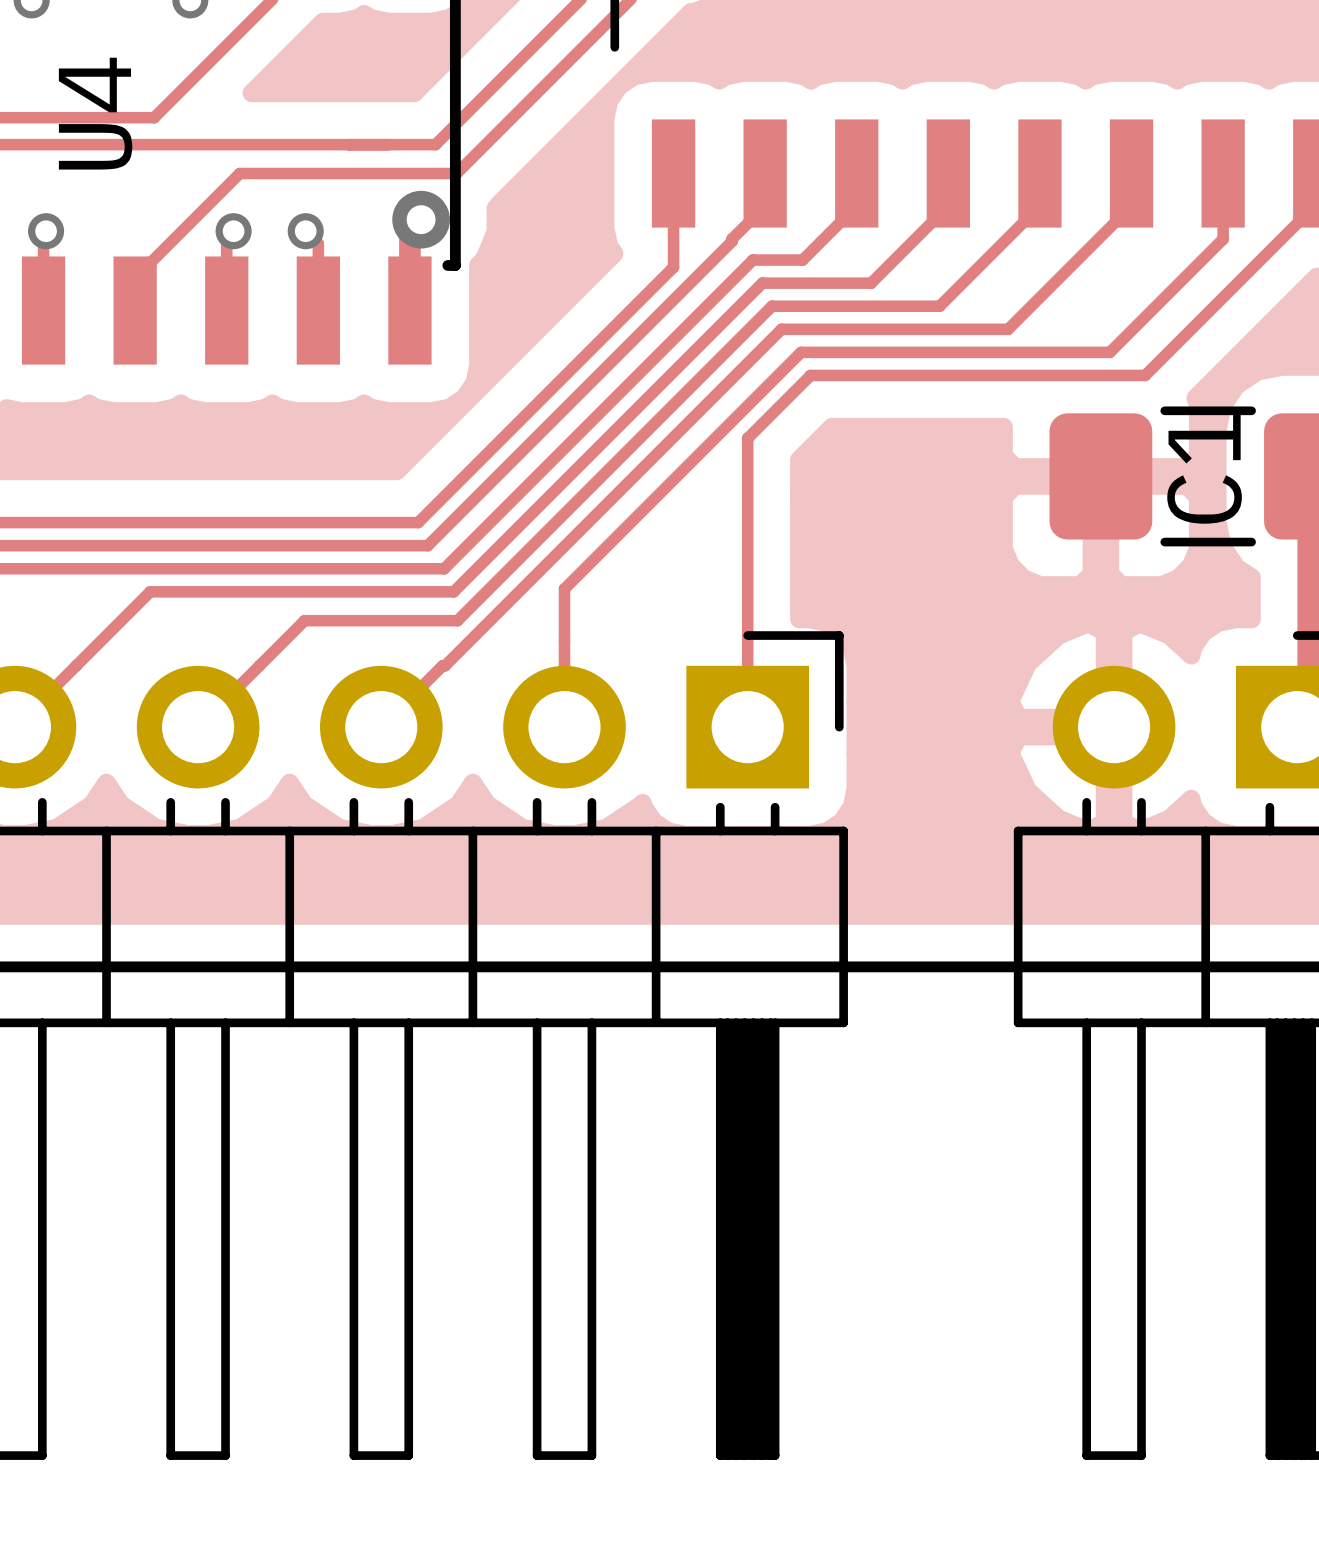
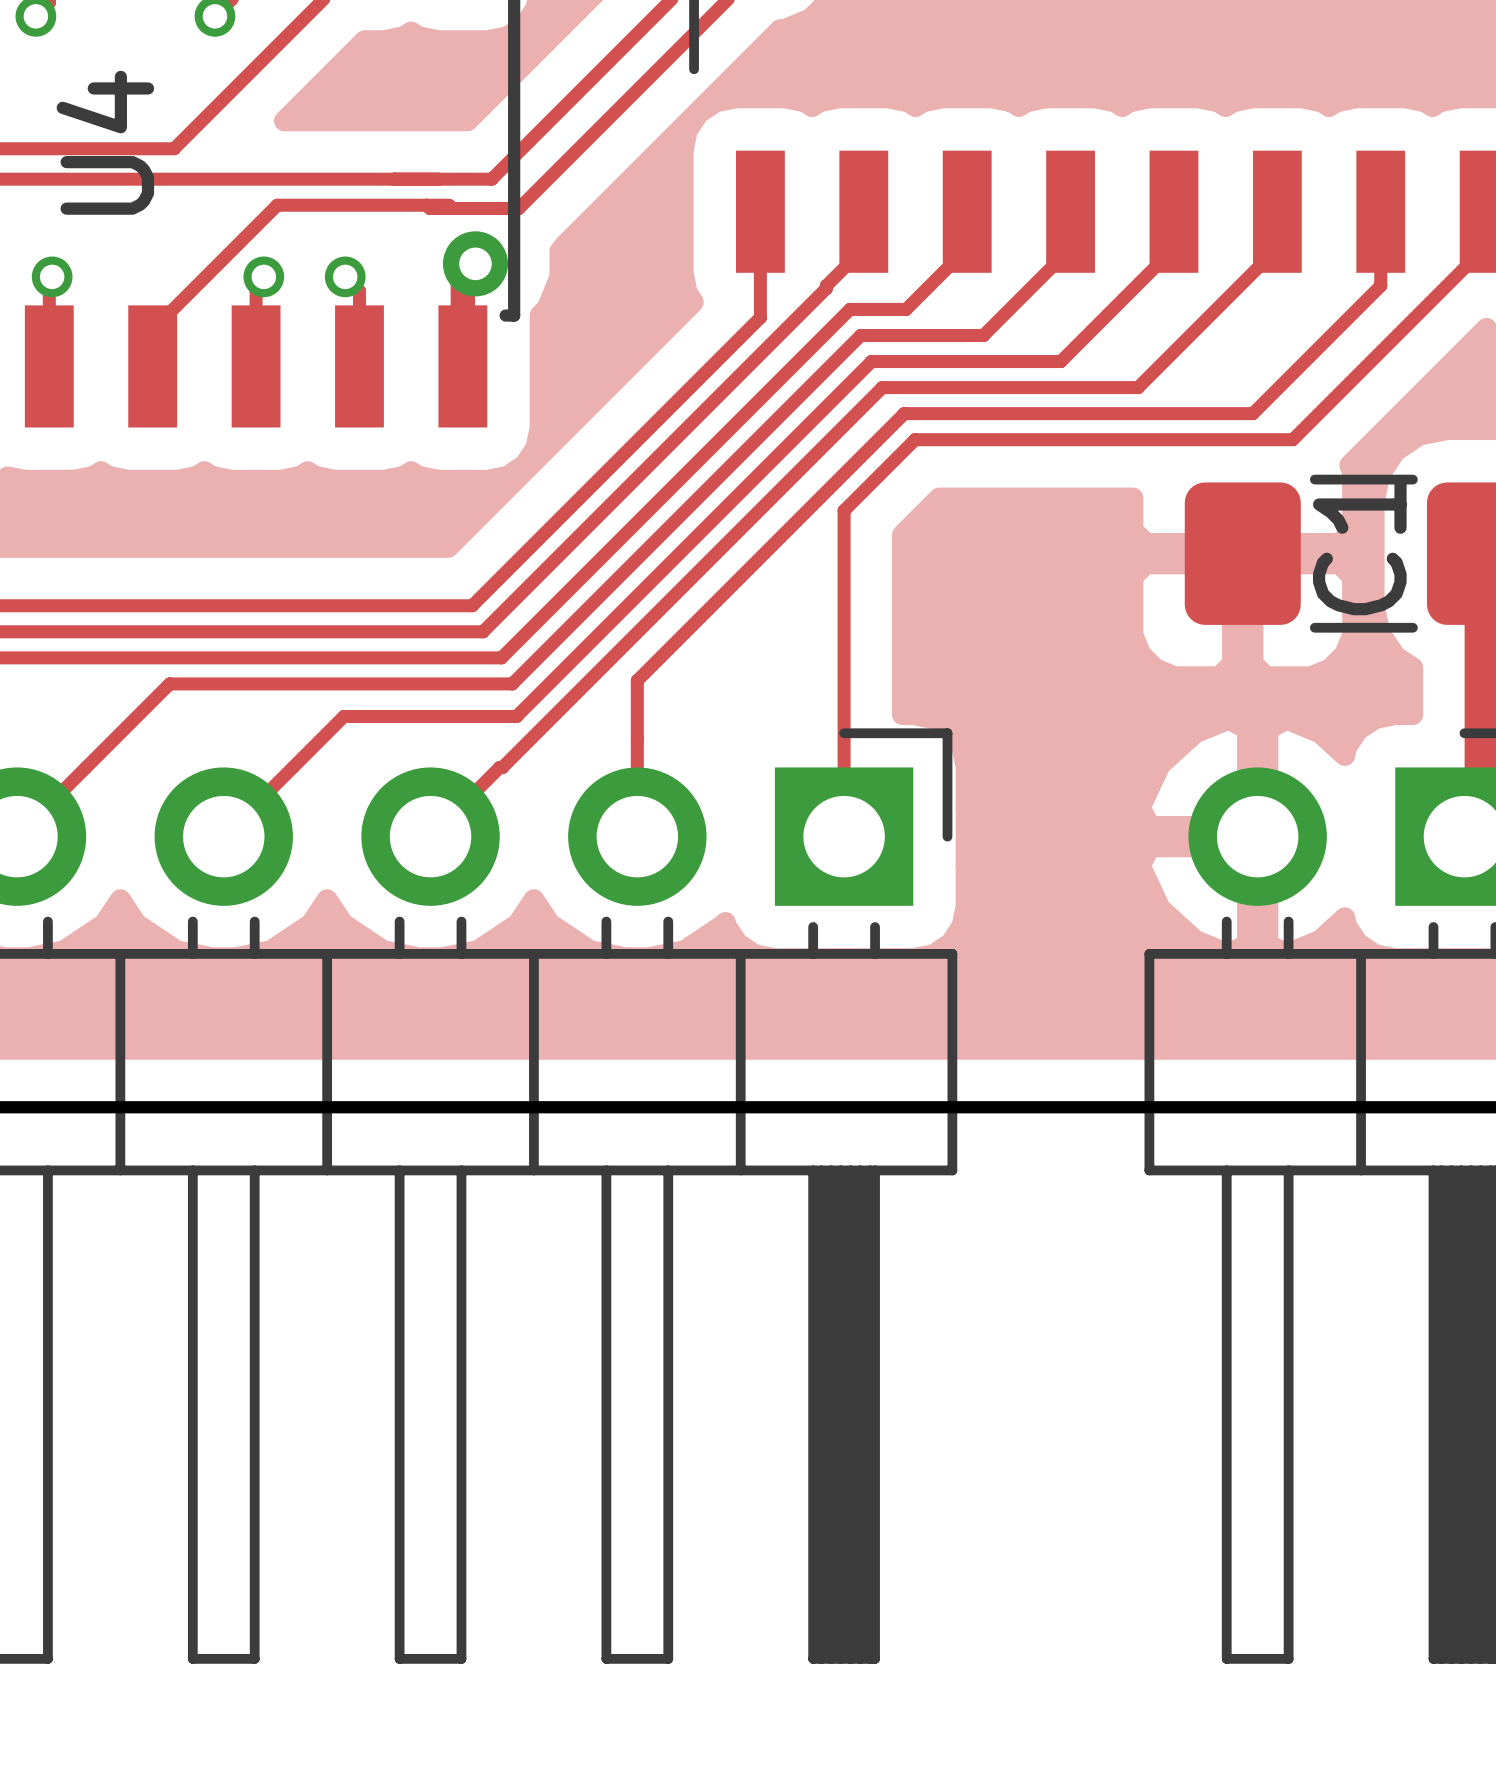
track: none -> (426, 205) (429, 208) (518, 208)
track: (459, 170) (456, 173) (239, 173) -> (449, 205) (277, 205) (270, 211)

